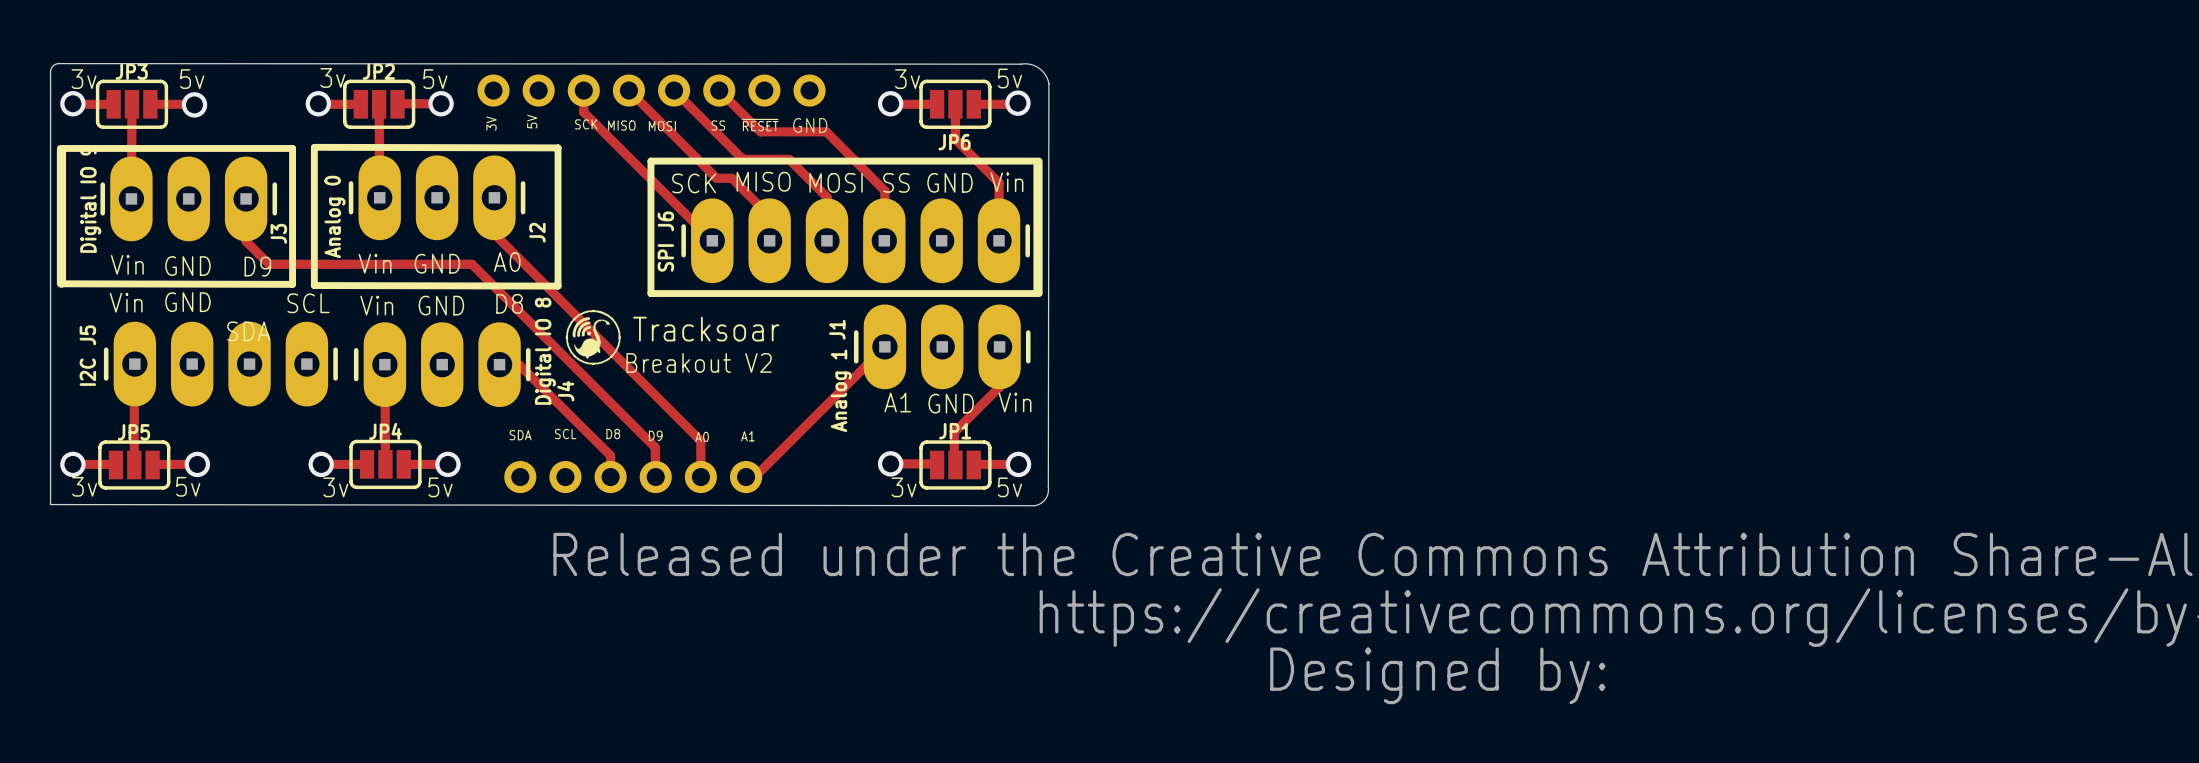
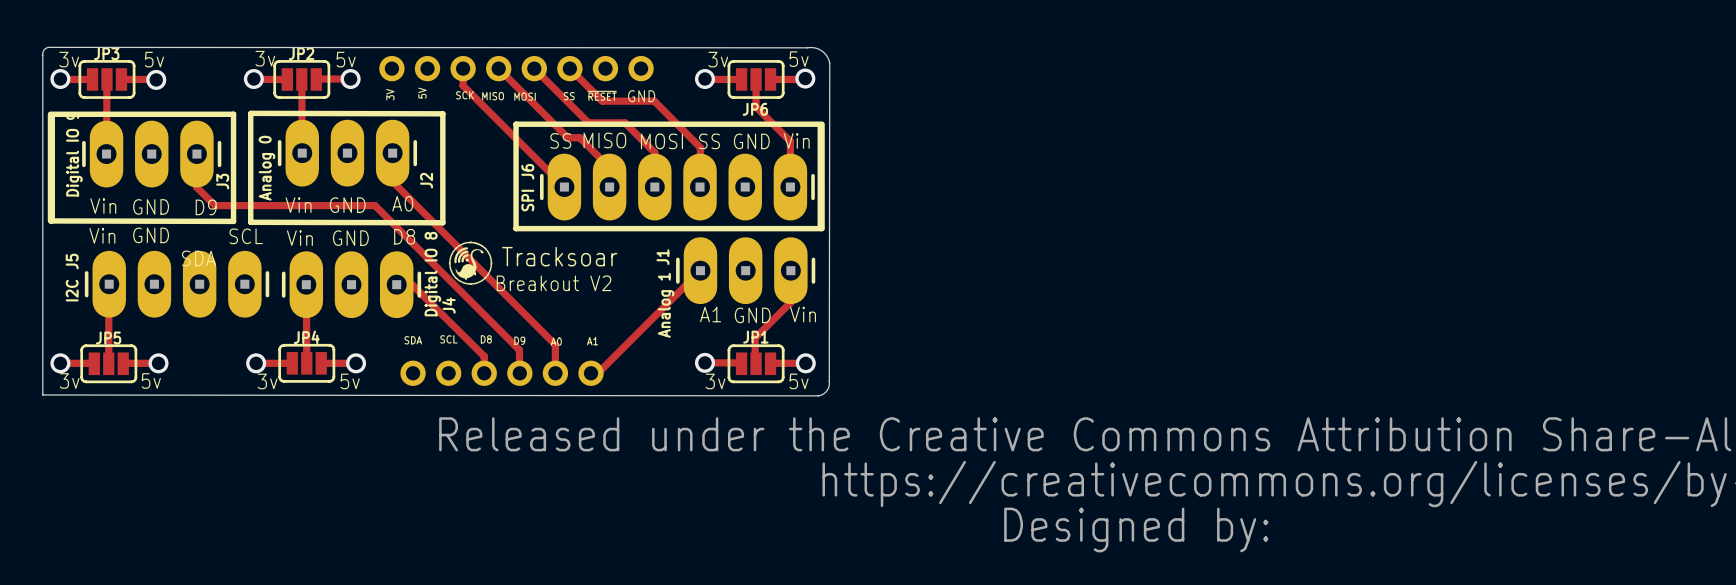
text: SCK (694, 183) -> SS (560, 140)

